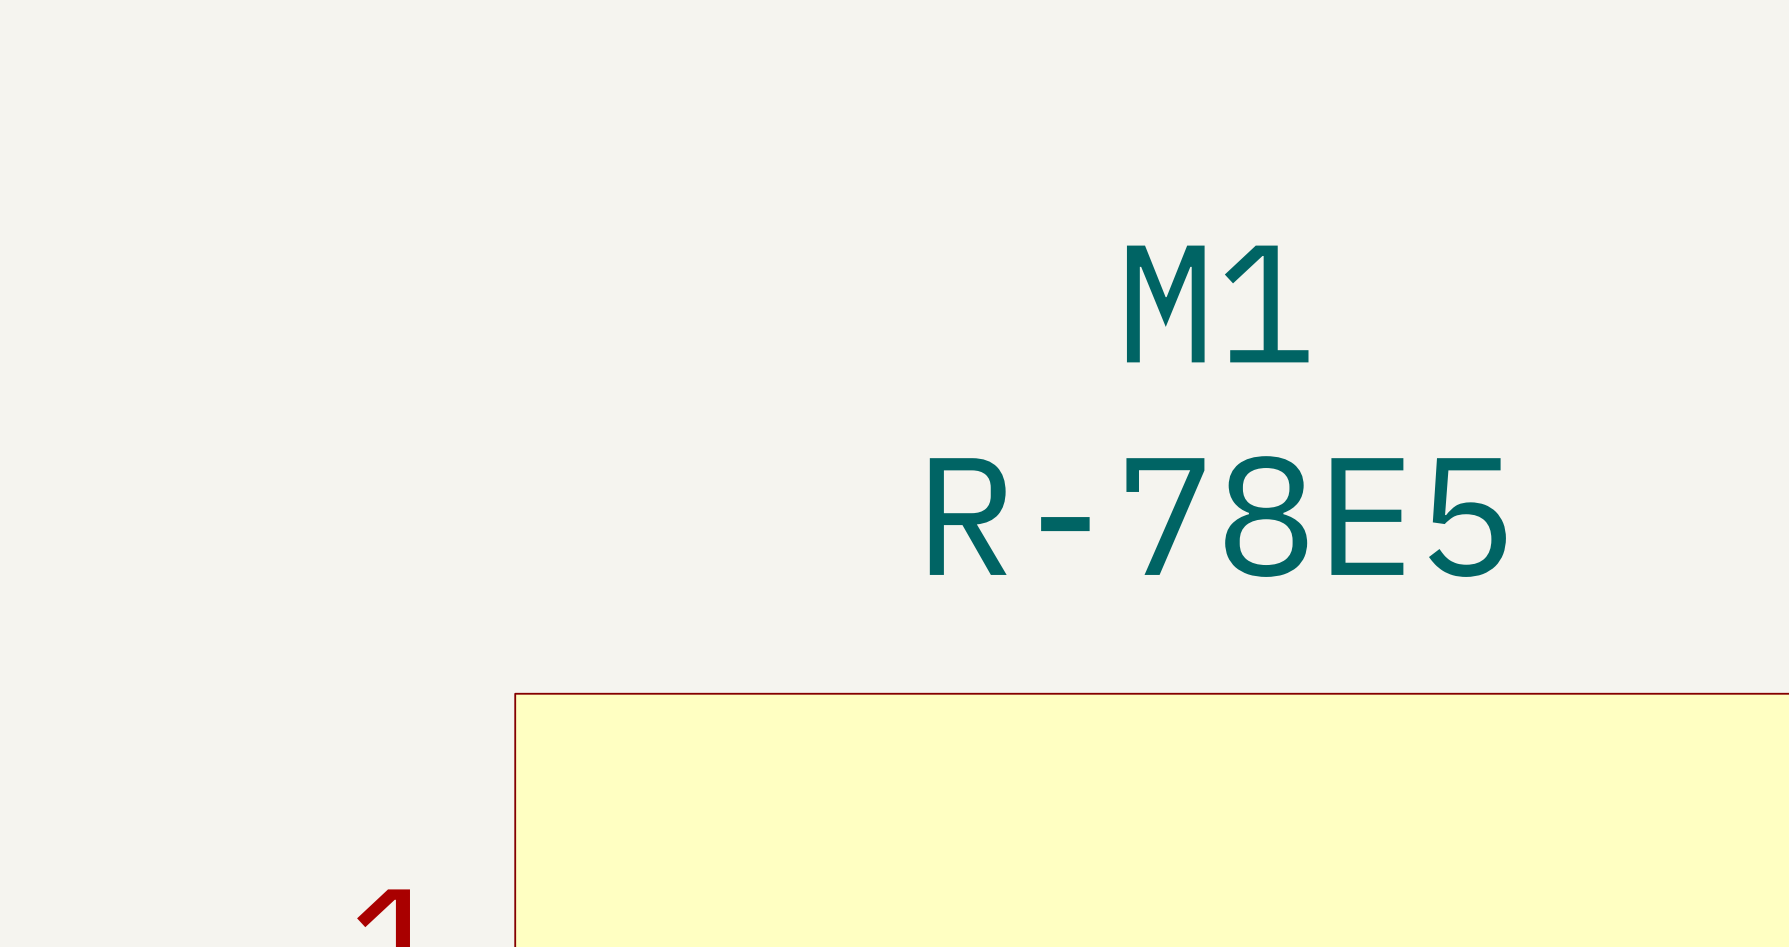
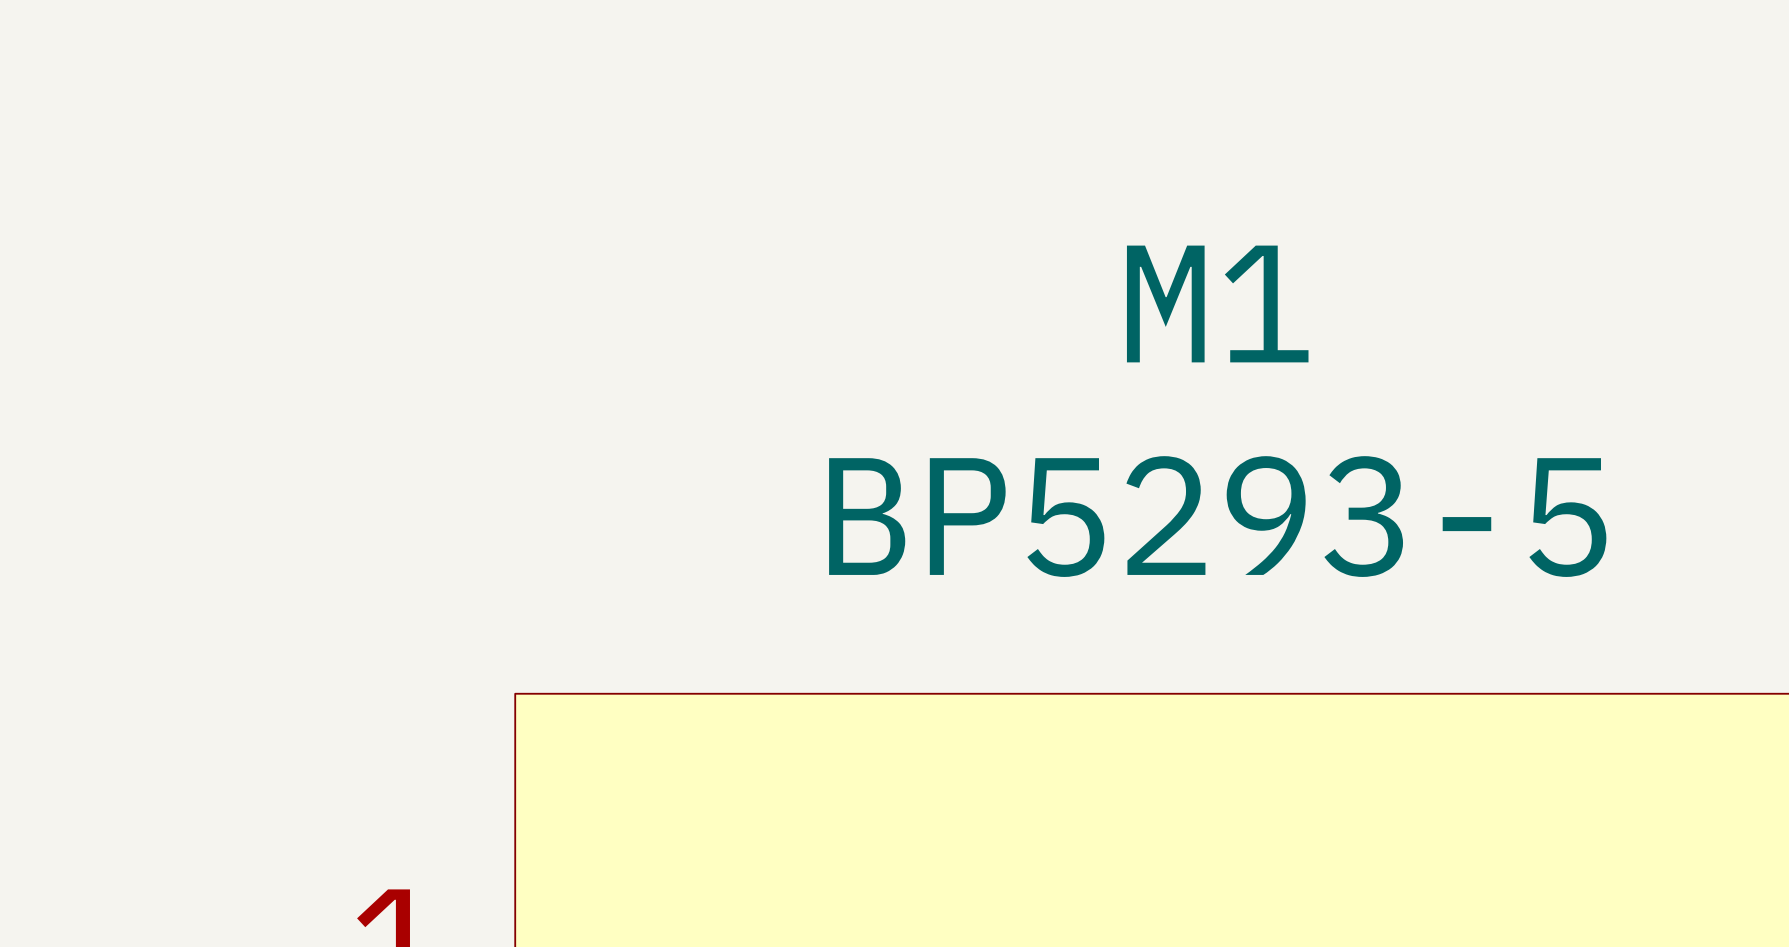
M1 value: R-78E5 (1217, 516) -> BP5293-5 (1217, 516)

